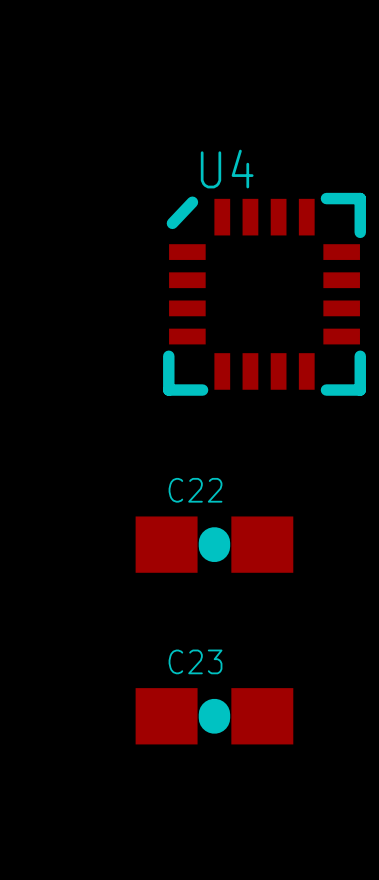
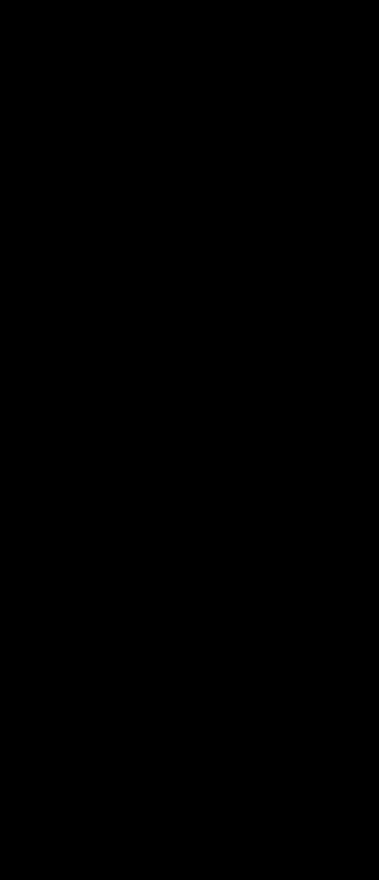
U4: (264, 294) -> none
C22: (214, 544) -> none
C23: (214, 716) -> none

